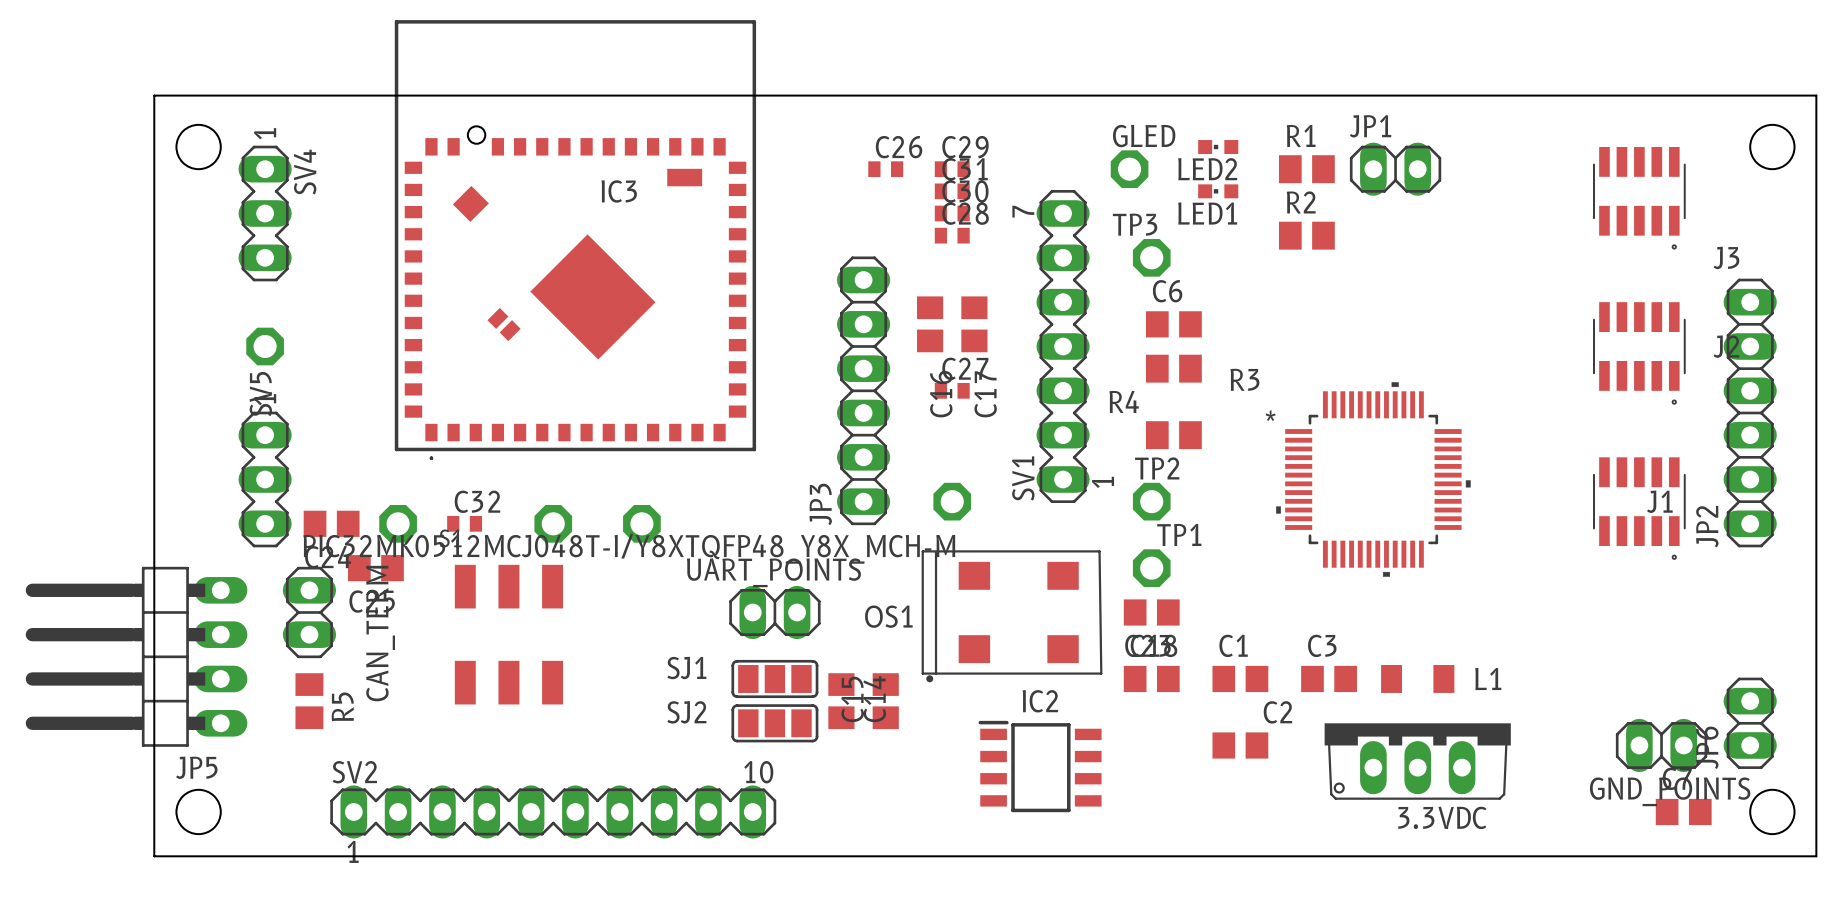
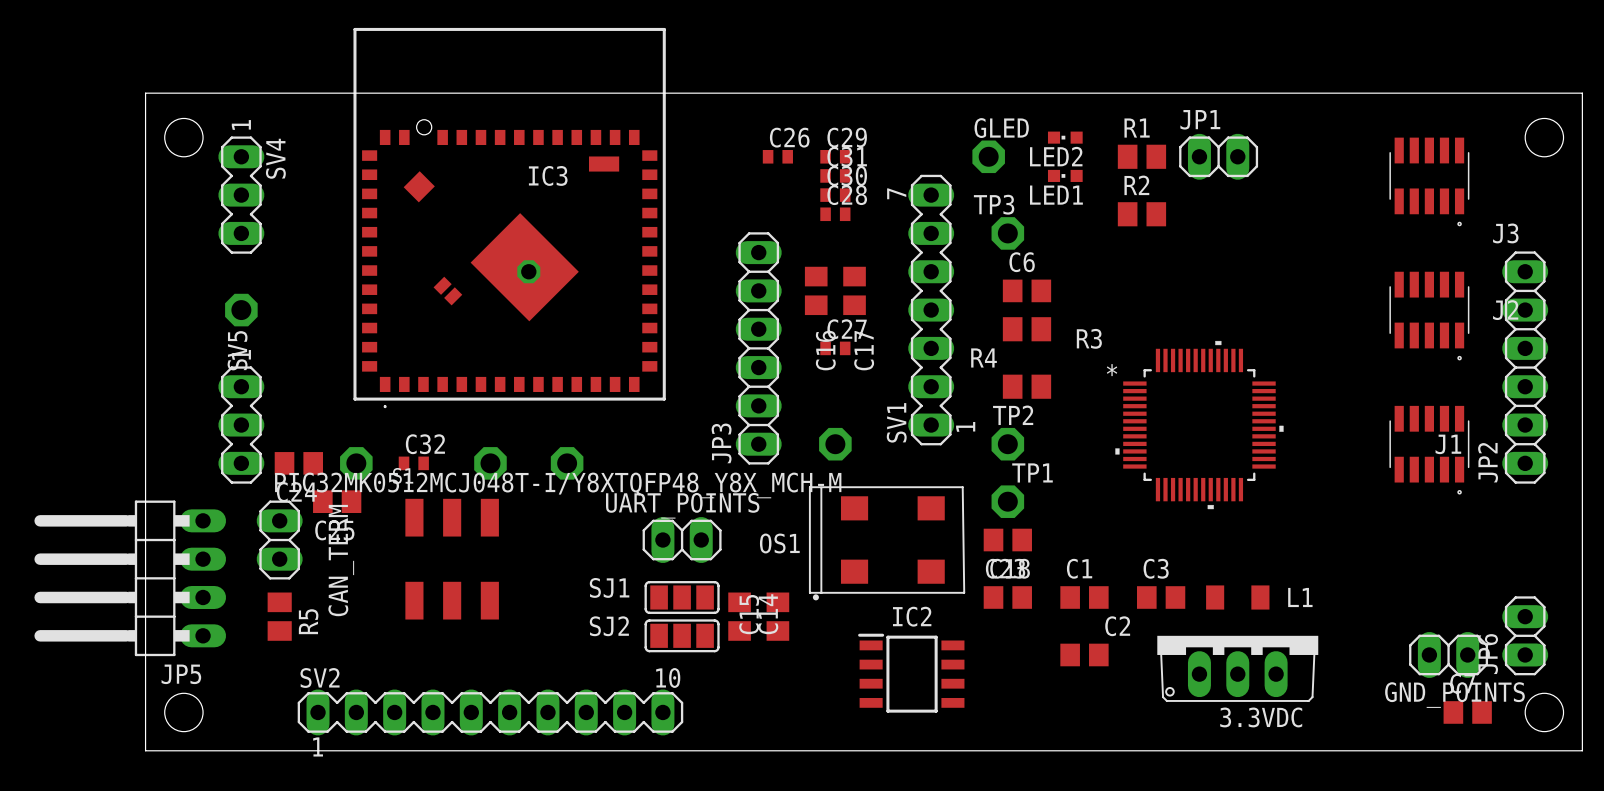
part: none -> (528, 271)

